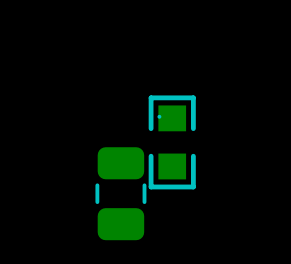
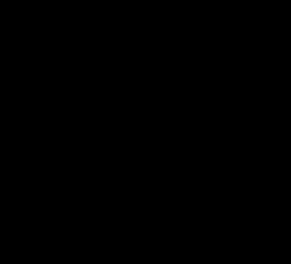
part: (172, 142) -> none
part: (120, 193) -> none

